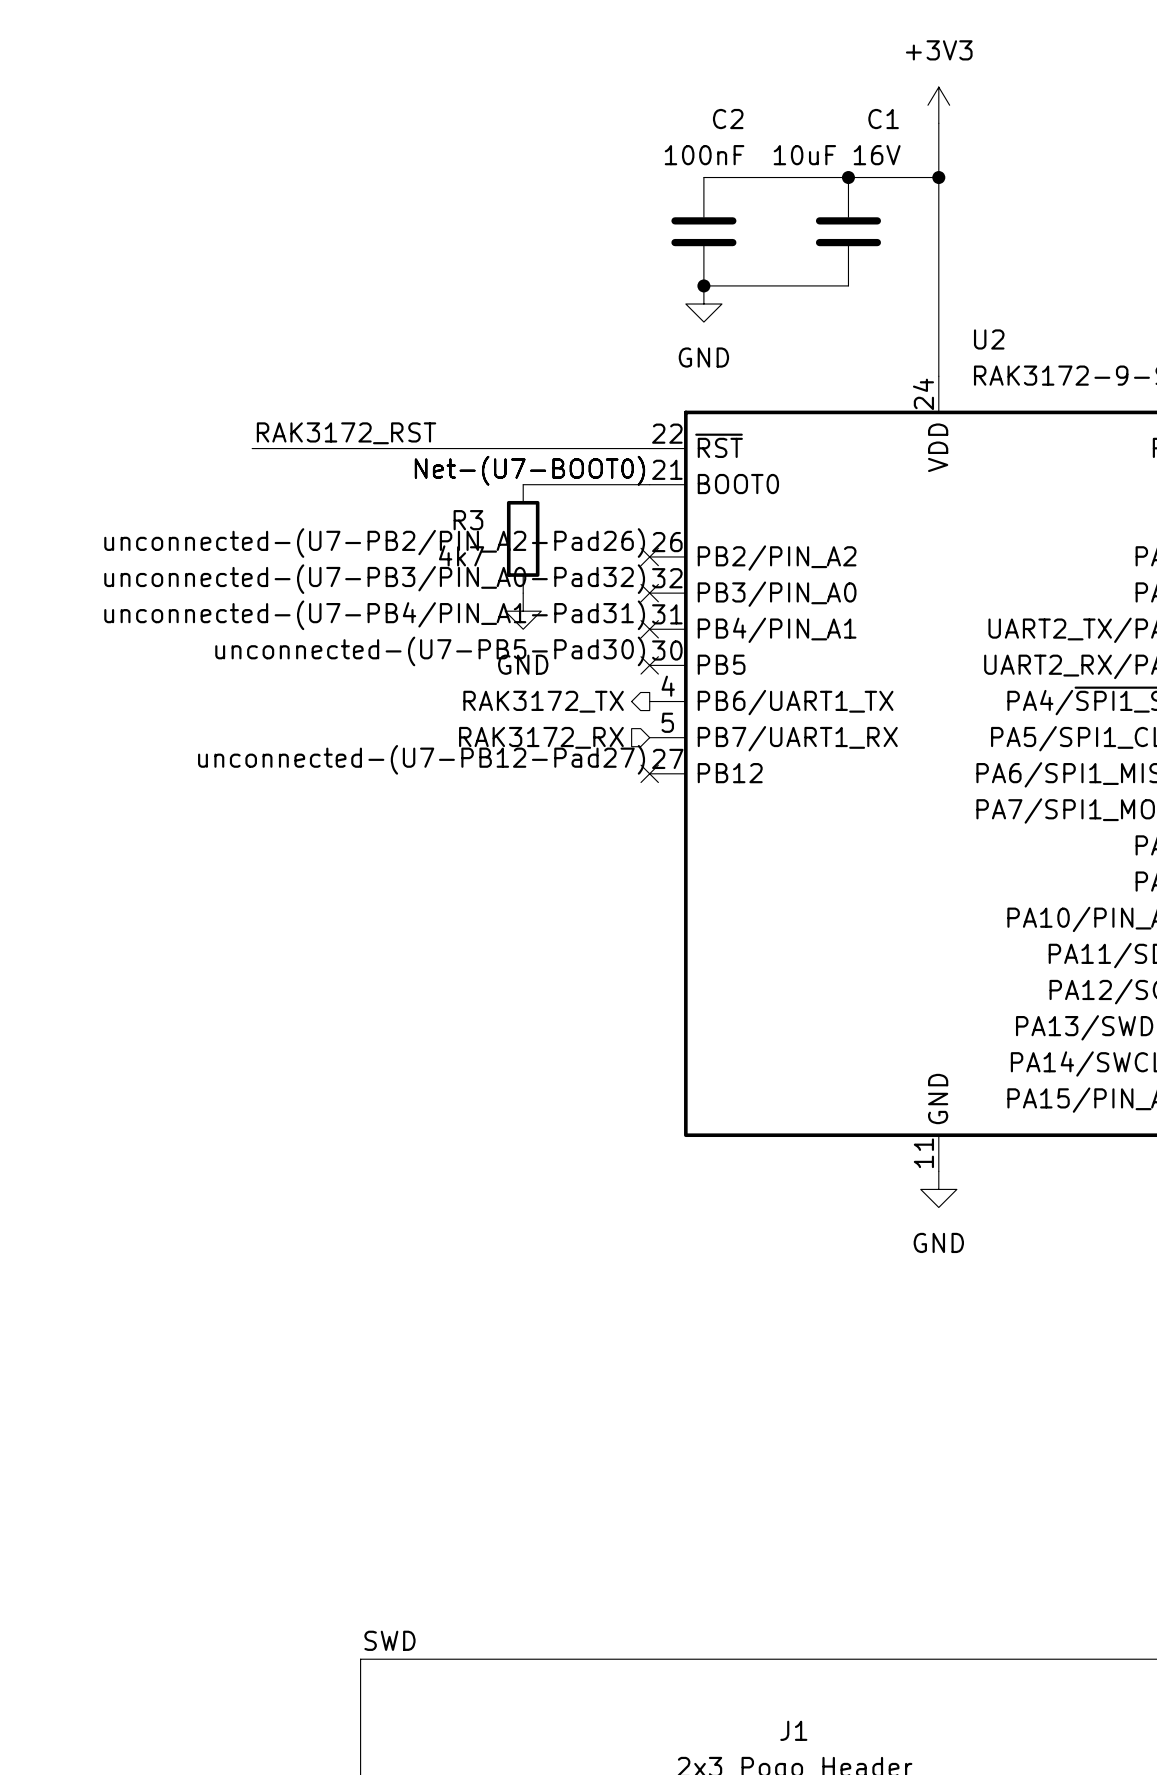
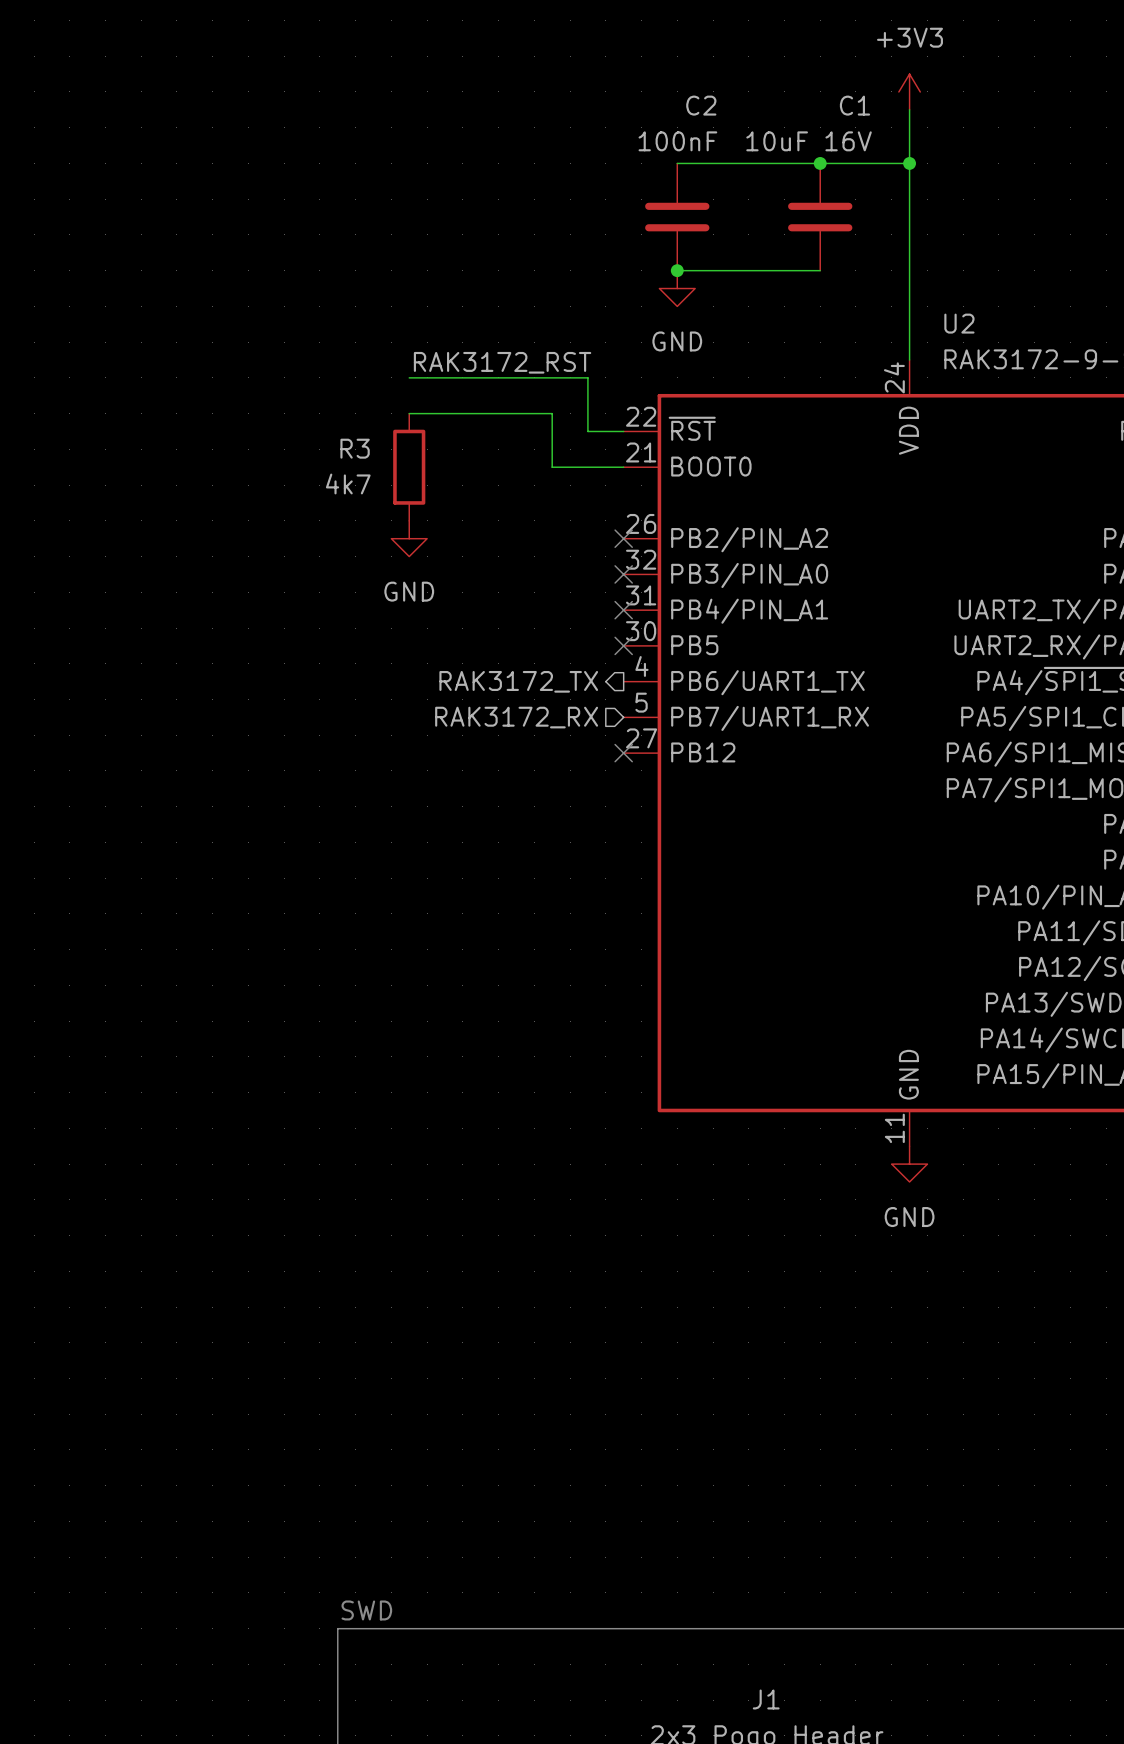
label position: RAK3172_RST (346, 433) -> RAK3172_RST (502, 362)
wire: (252, 448) (613, 448) -> (409, 377) (587, 377) (587, 431)
label: Net-(U7-BOOT0) (529, 470) -> none
wire: (523, 484) (577, 484) -> (409, 413) (552, 413) (552, 467)
R3 position: (523, 538) -> (409, 467)
label: unconnected-(U7-PB2/PIN_A2-Pad26) (374, 543) -> none
label: unconnected-(U7-PB3/PIN_A0-Pad32) (374, 579) -> none
power symbol position: GND (523, 611) -> GND (409, 538)
label: unconnected-(U7-PB4/PIN_A1-Pad31) (374, 615) -> none
label: unconnected-(U7-PB5-Pad30) (430, 651) -> none
label: unconnected-(U7-PB12-Pad27) (421, 759) -> none

